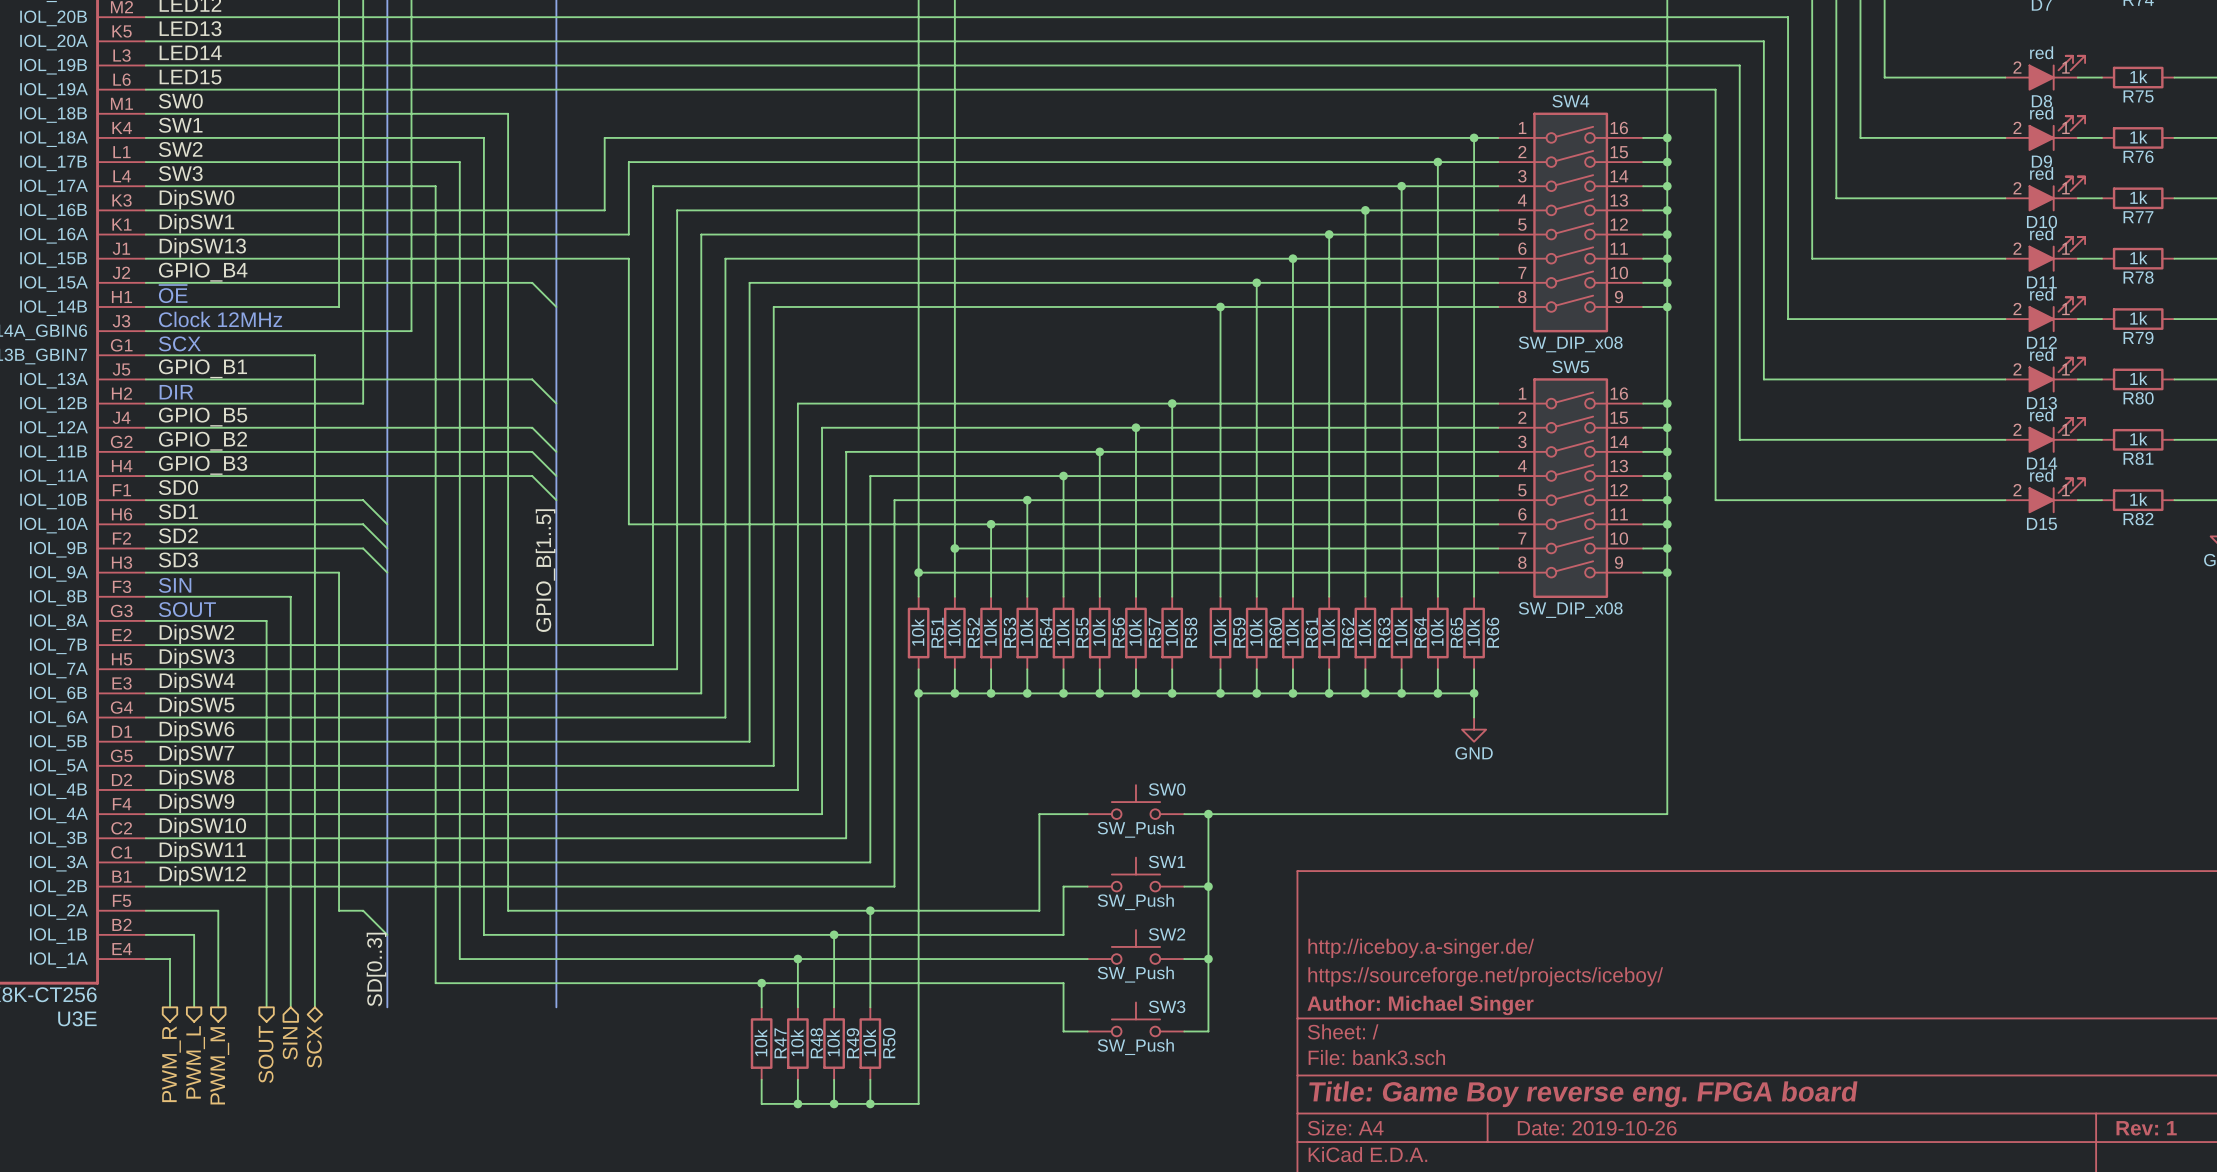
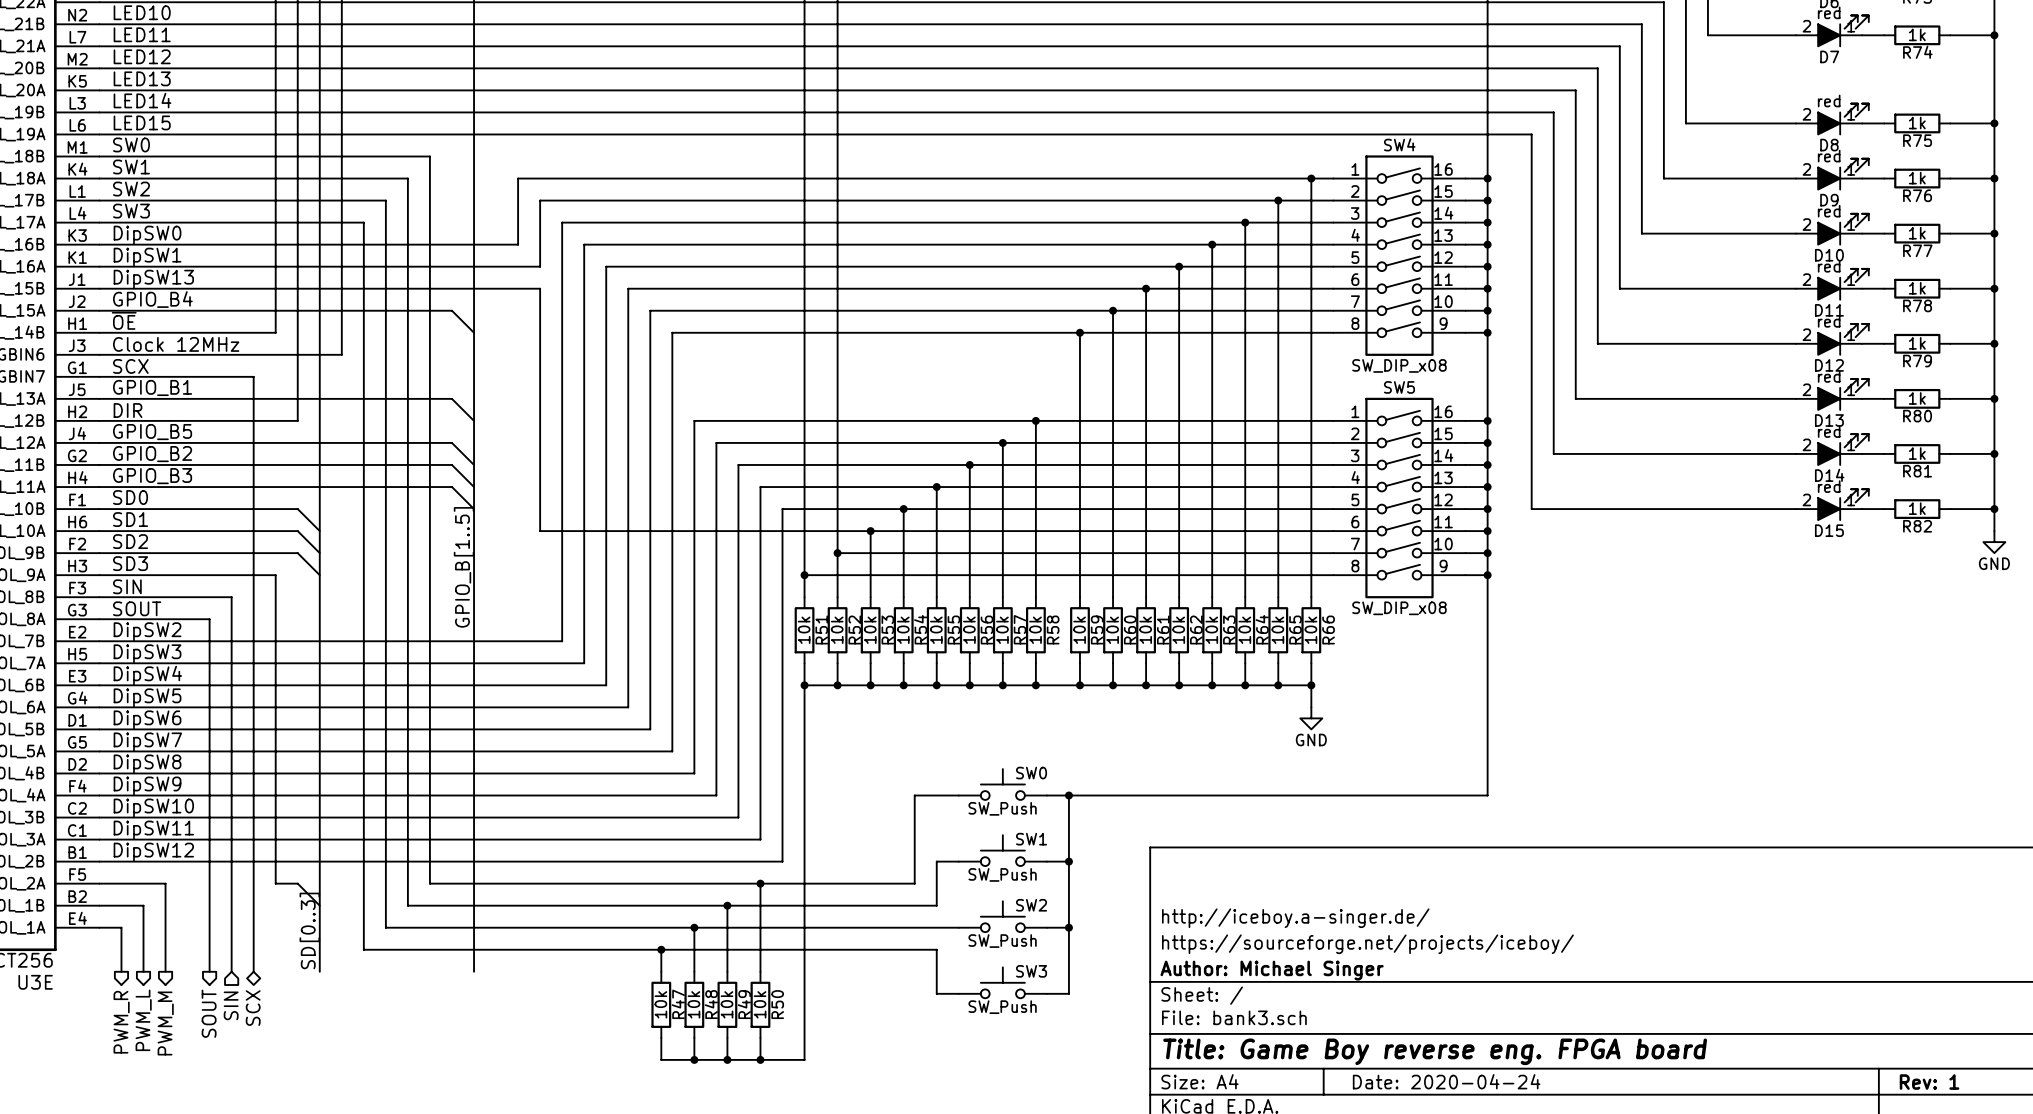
title block: Date: 2019-10-26 (1597, 1128) -> Date: 2020-04-24 (1446, 1081)

